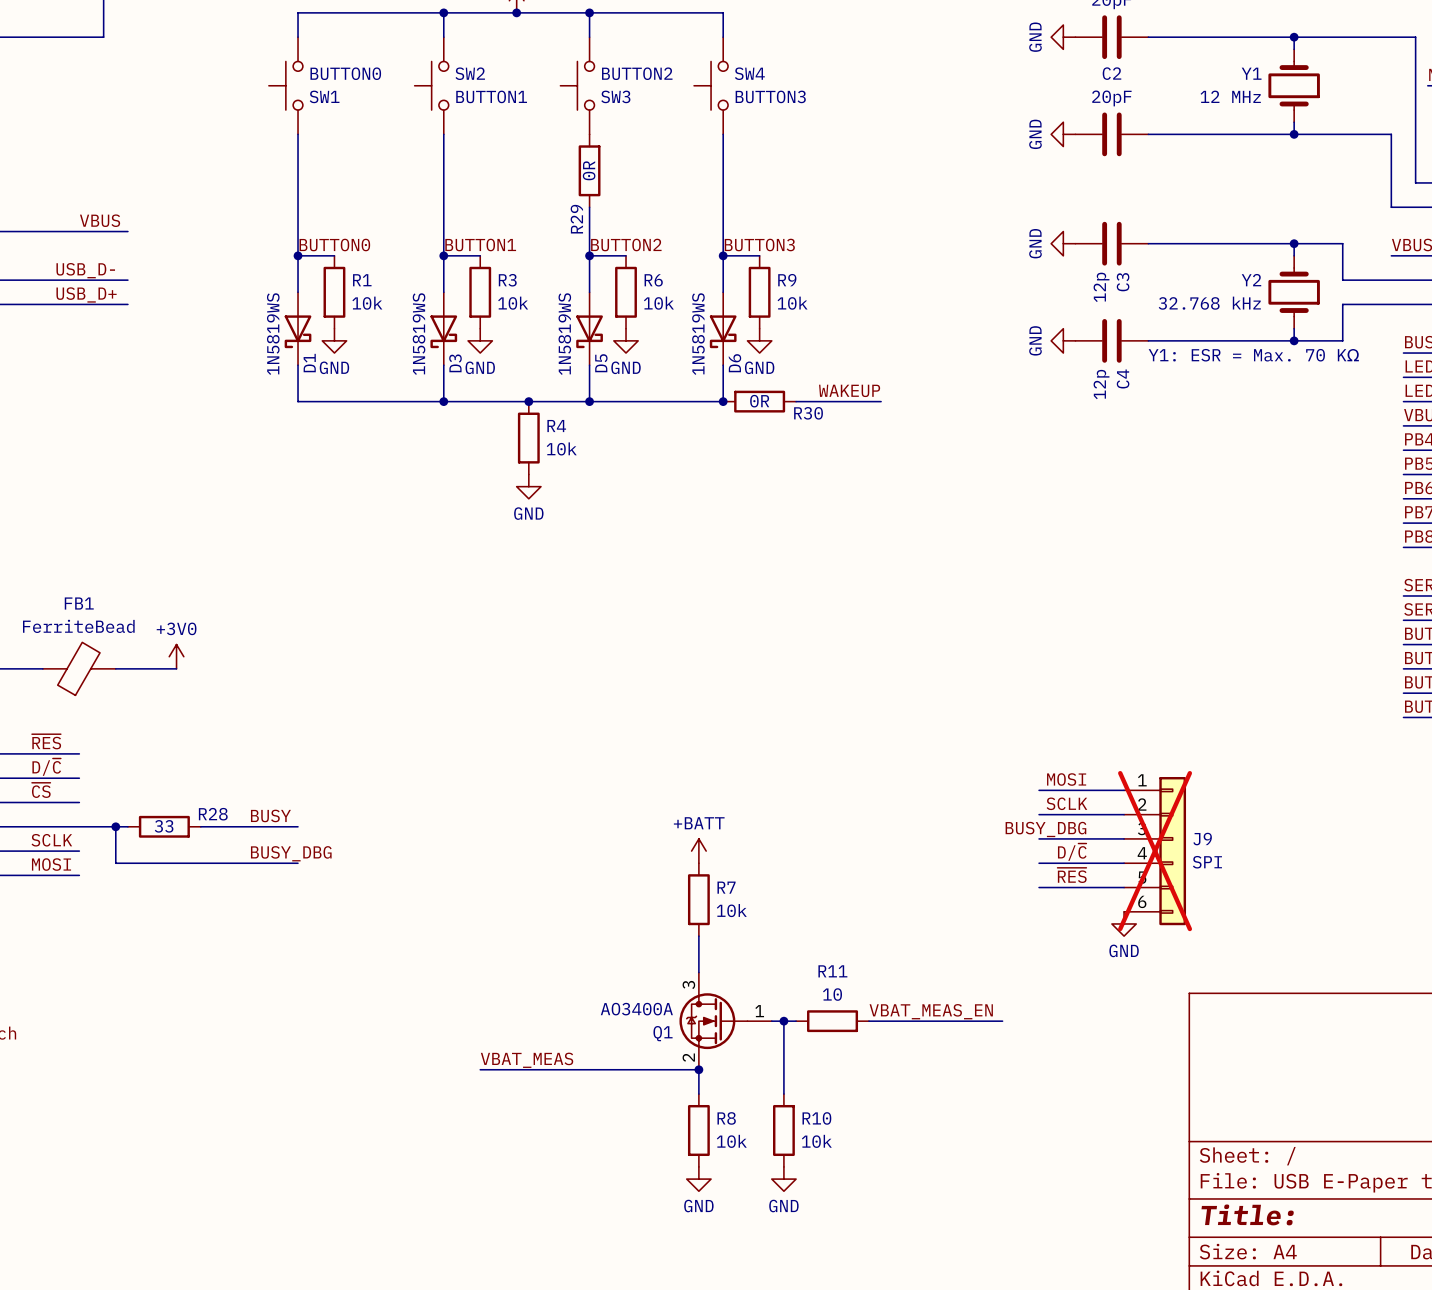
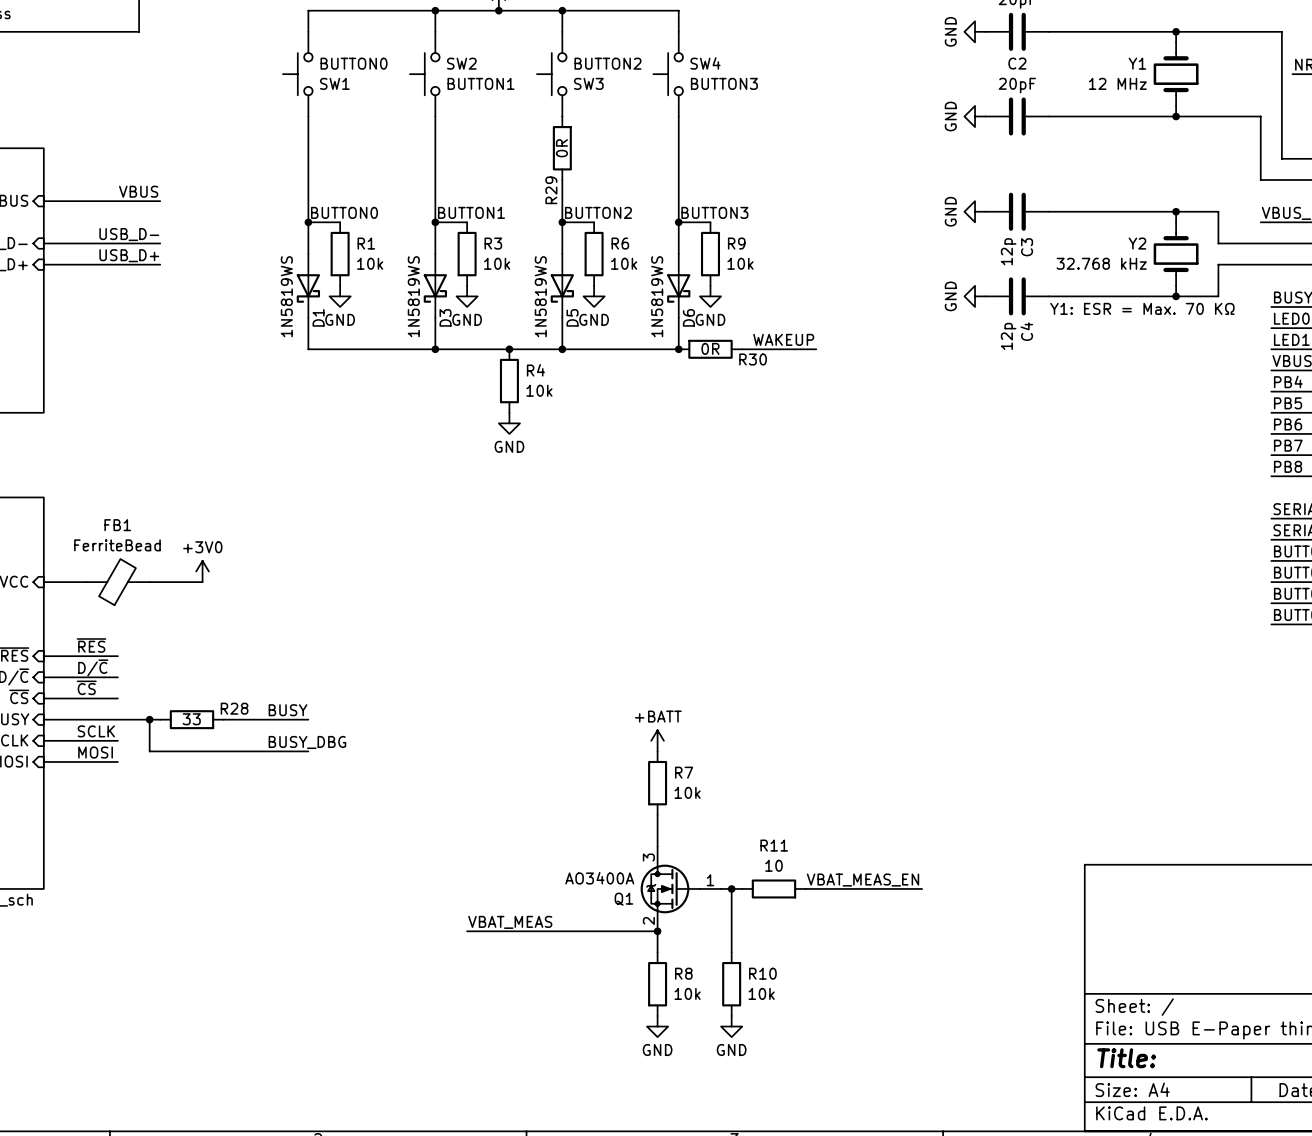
label: MOSI (1066, 779) -> none
wire: (1039, 790) (1124, 790) -> none
label: SCLK (1066, 803) -> none
wire: (1039, 814) (1124, 814) -> none
label: BUSY_DBG (1045, 829) -> none
wire: (1039, 838) (1124, 838) -> none
J9: SPI (1155, 851) -> none
label: D/~{C} (1072, 852) -> none
wire: (1039, 863) (1124, 863) -> none
label: ~{RES} (1072, 875) -> none
wire: (1039, 887) (1124, 887) -> none
power symbol: GND (1124, 923) -> none

